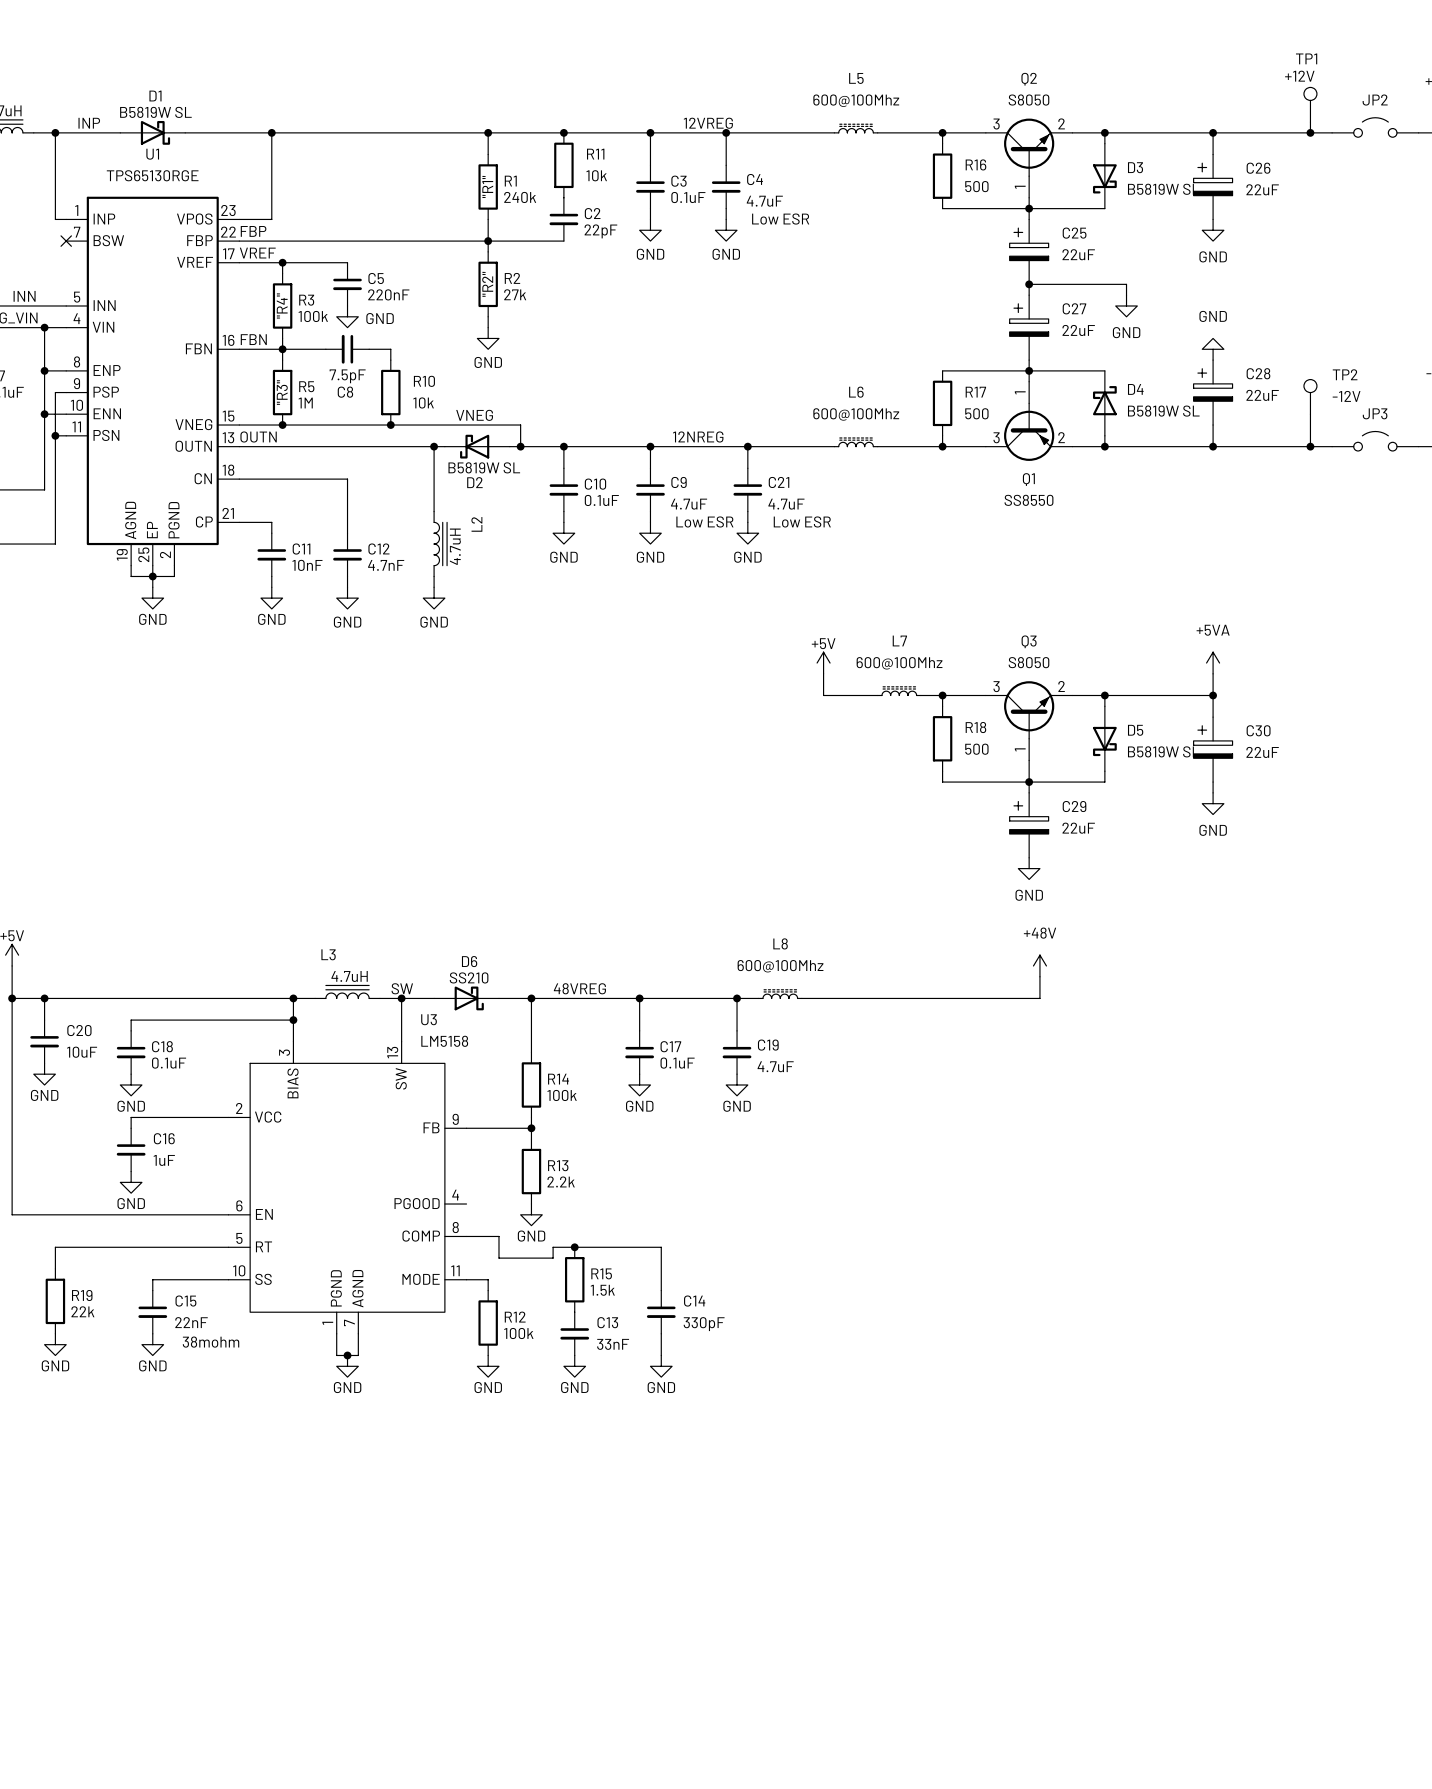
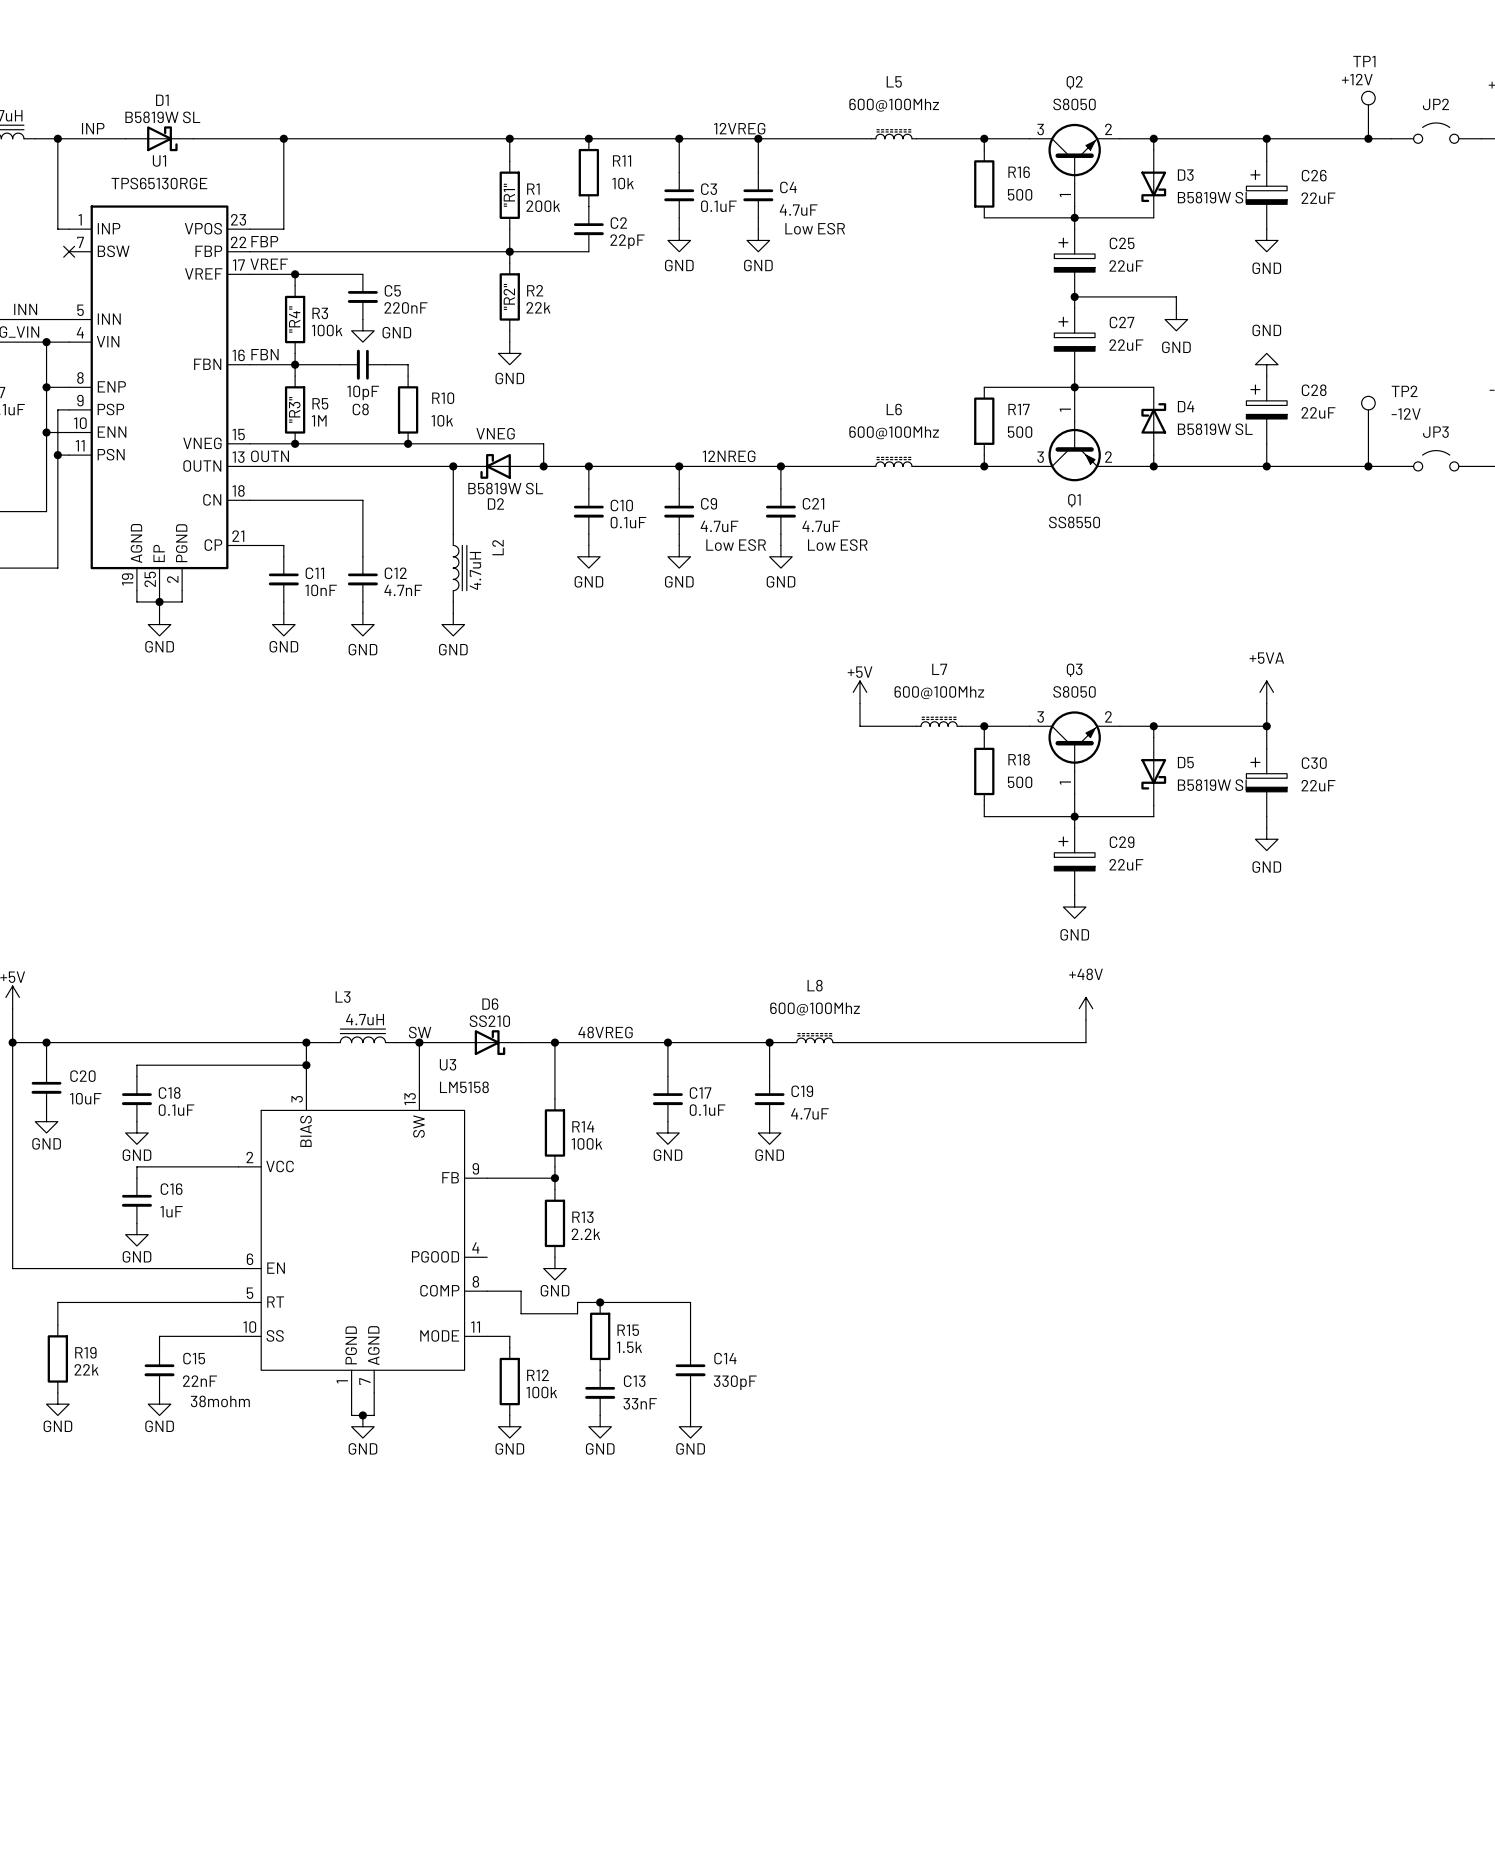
R1 value: 240k (520, 197) -> 200k (543, 206)
R2 value: 27k (515, 294) -> 22k (538, 307)
C8 value: 7.5pF (347, 376) -> 10pF (363, 392)

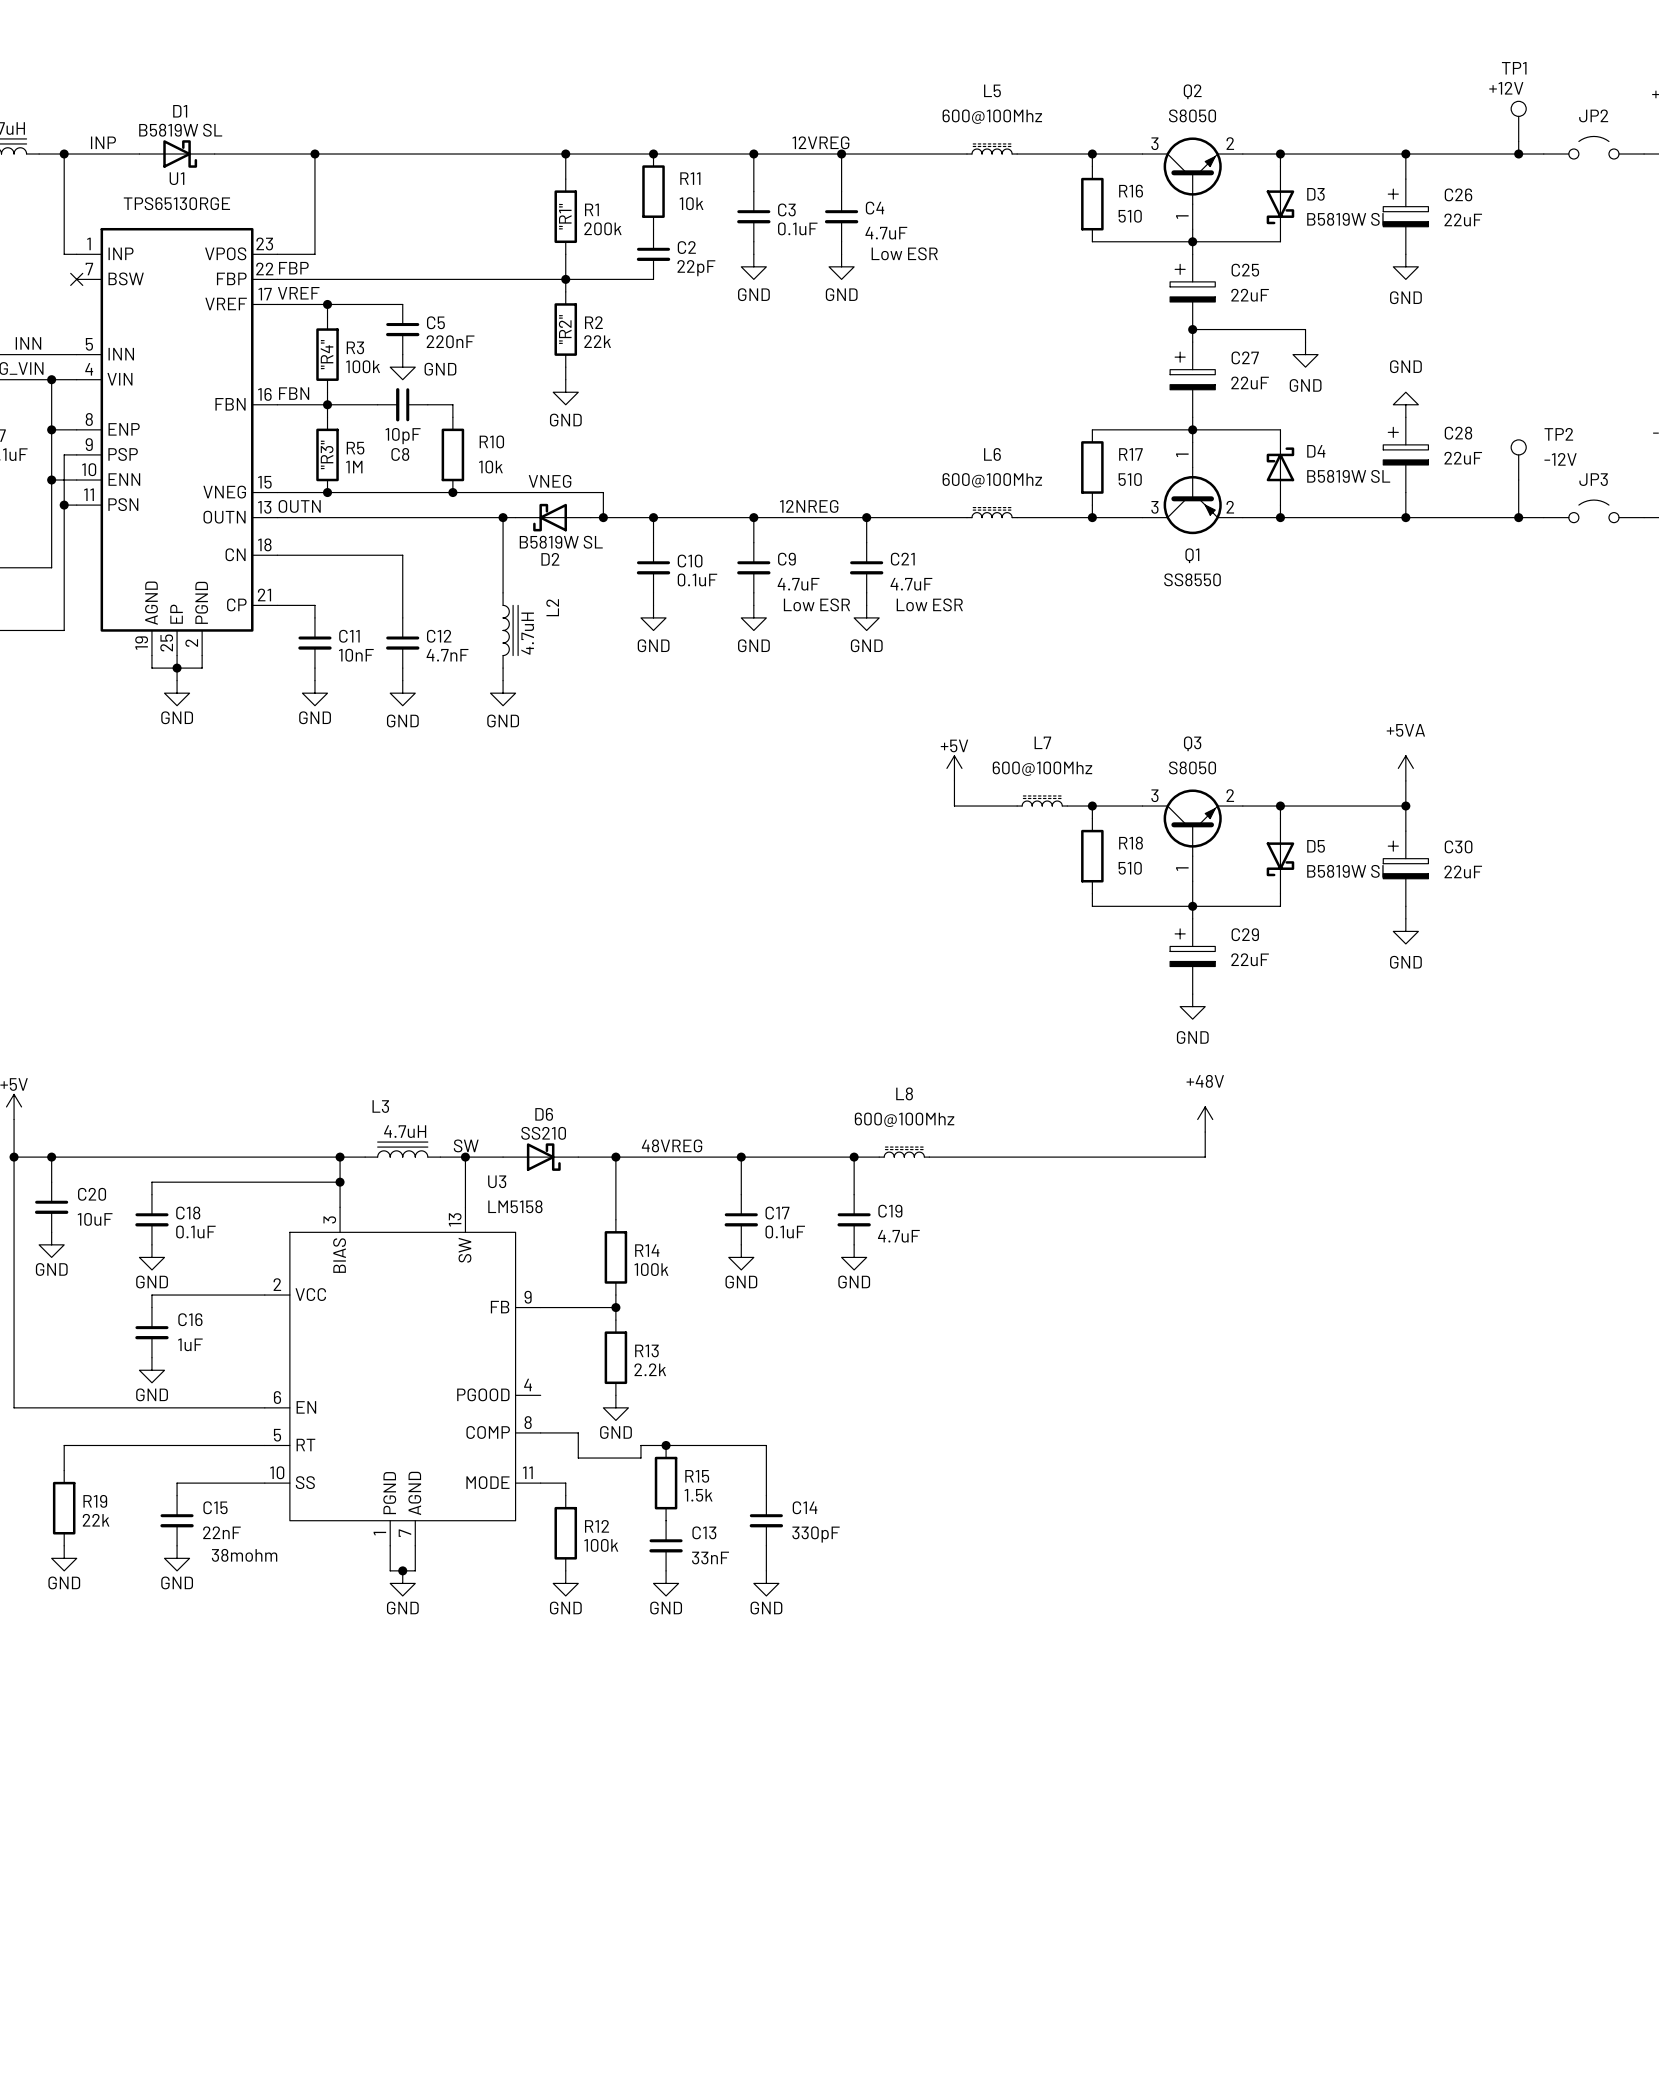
R16 value: 500 (1020, 194) -> 510 (1130, 216)
R17 value: 500 (1020, 432) -> 510 (1130, 479)
R18 value: 500 (1020, 782) -> 510 (1130, 868)

